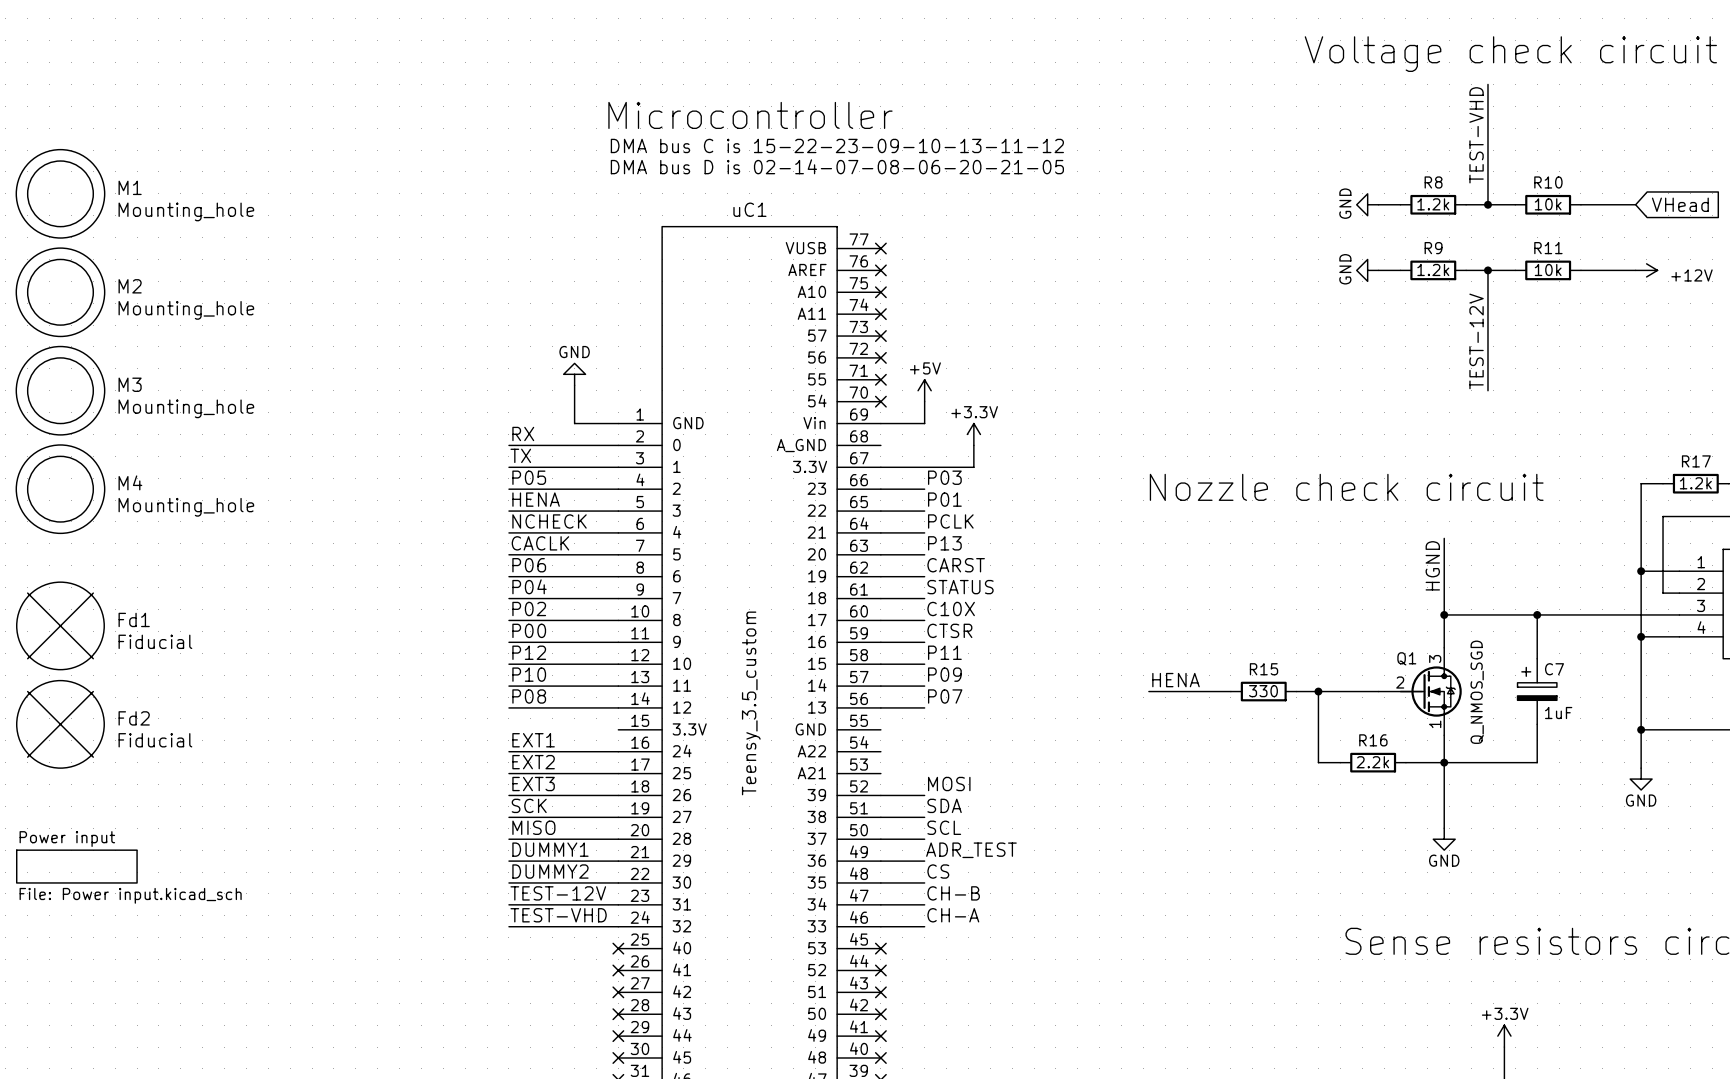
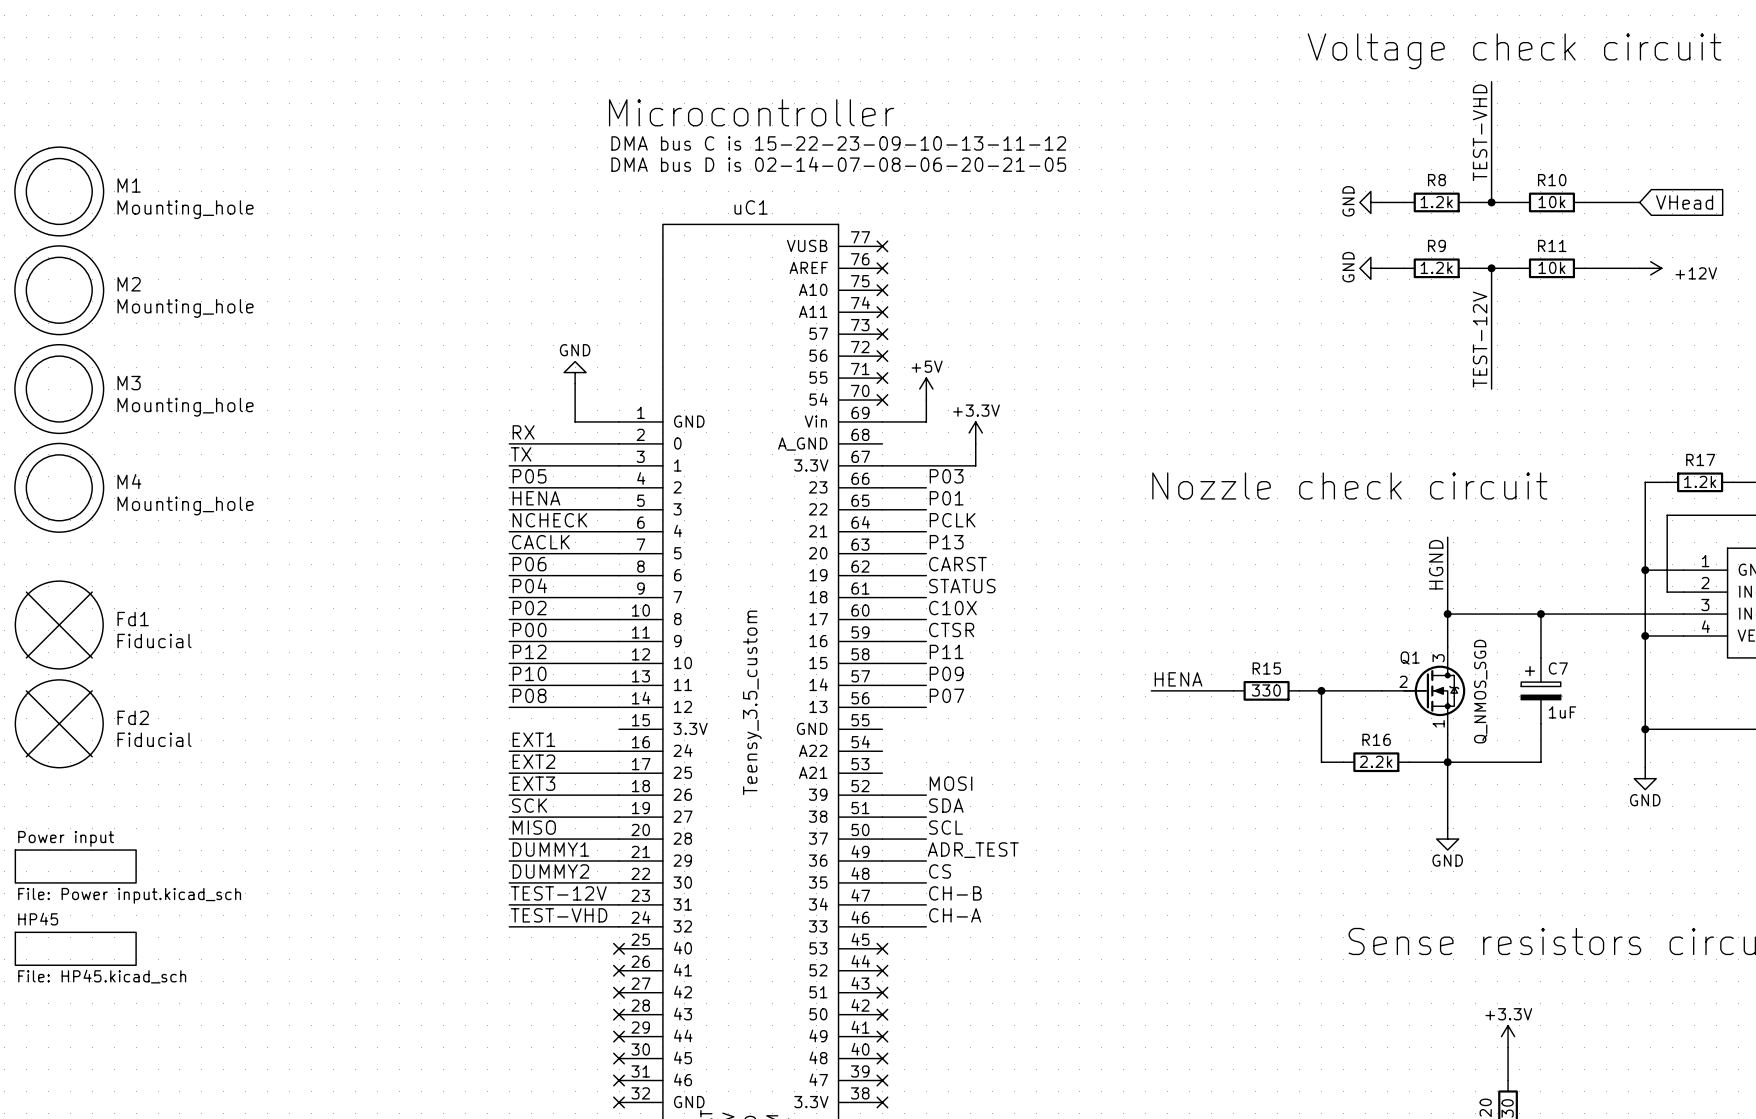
sheet HP45: none -> File: HP45.kicad_sch (75, 948)

